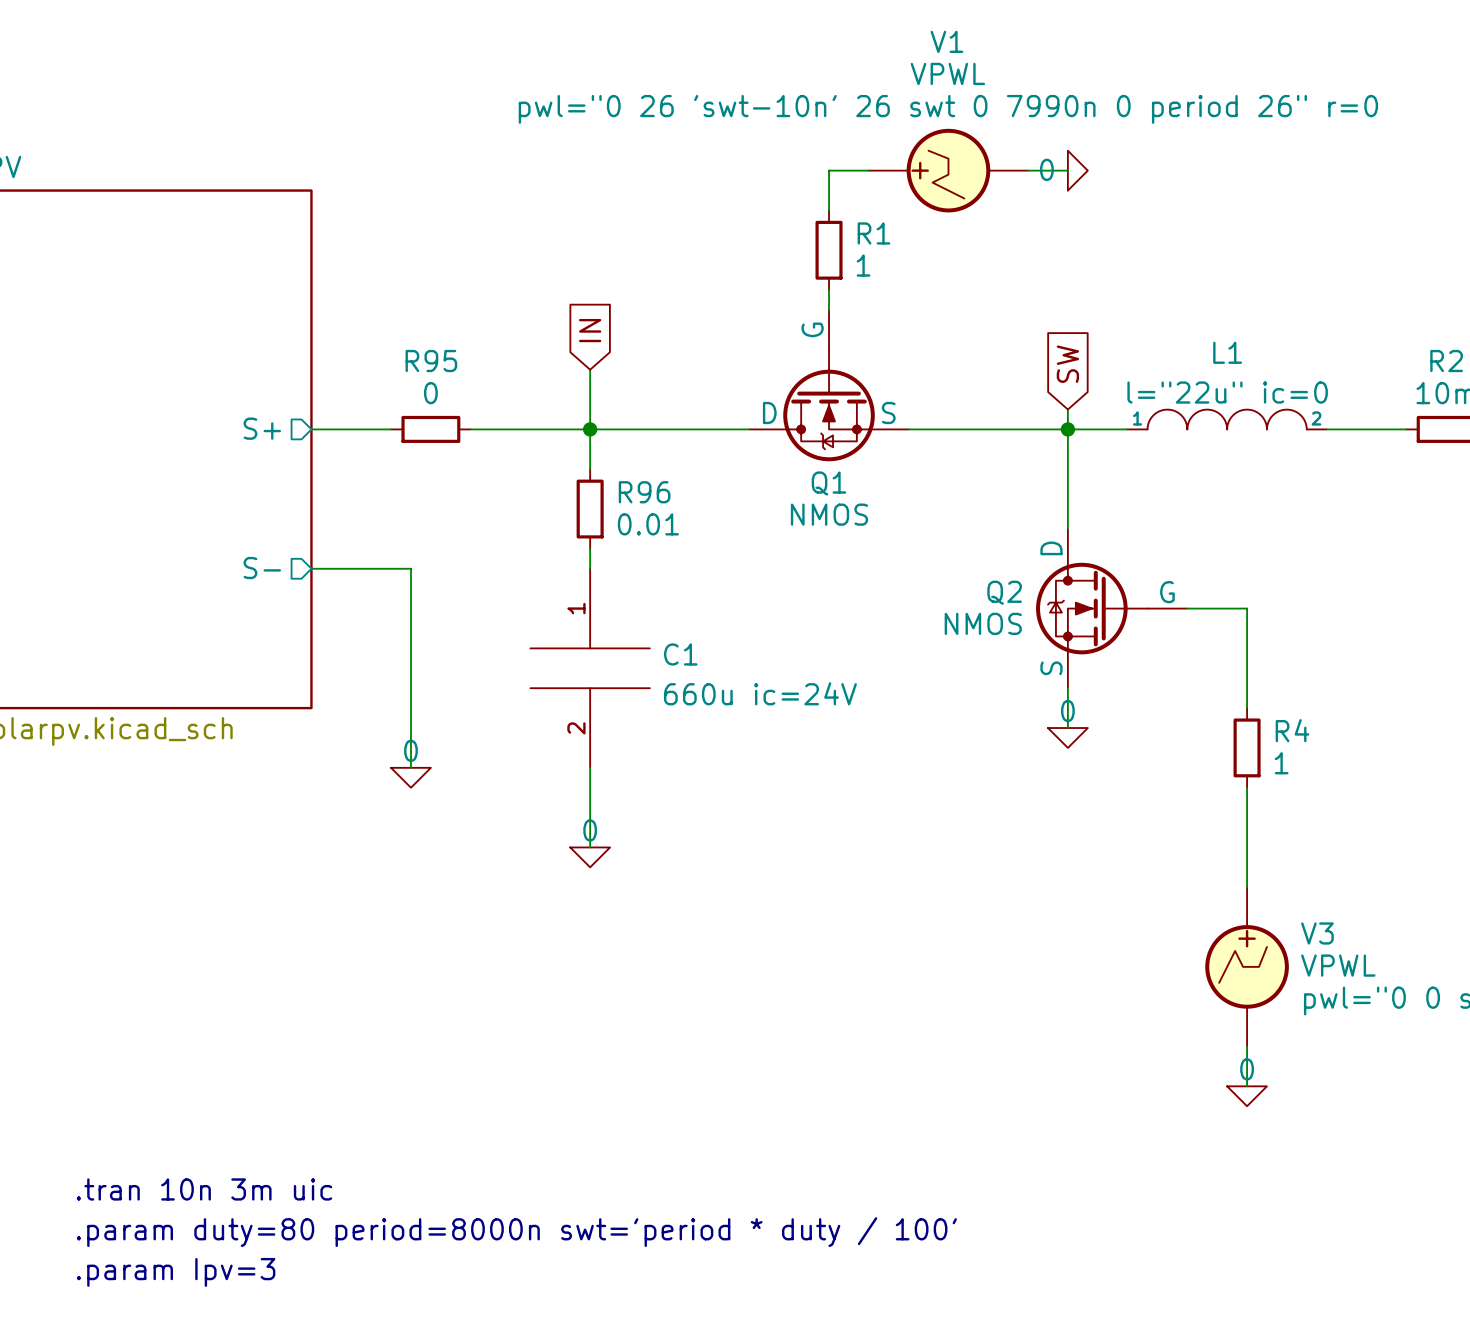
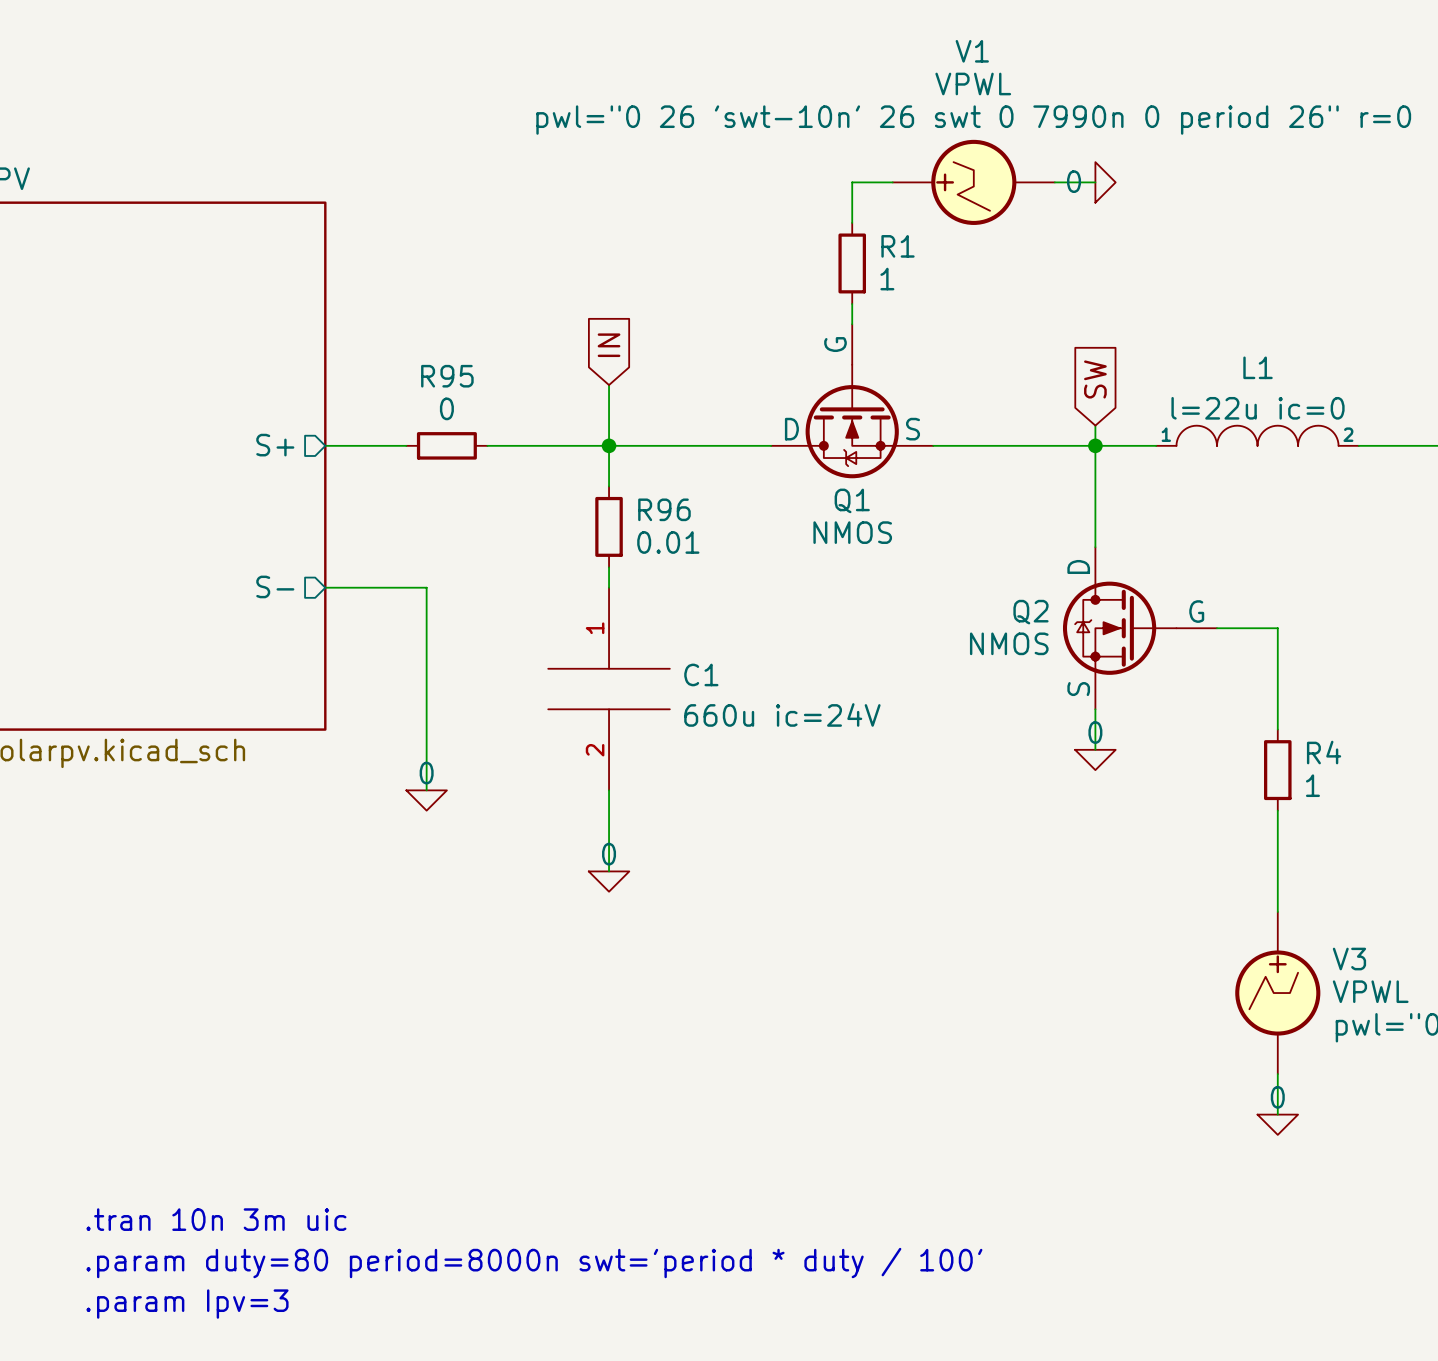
L1 value: l="22u" ic=0 (1227, 392) -> l=22u ic=0 (1258, 408)

